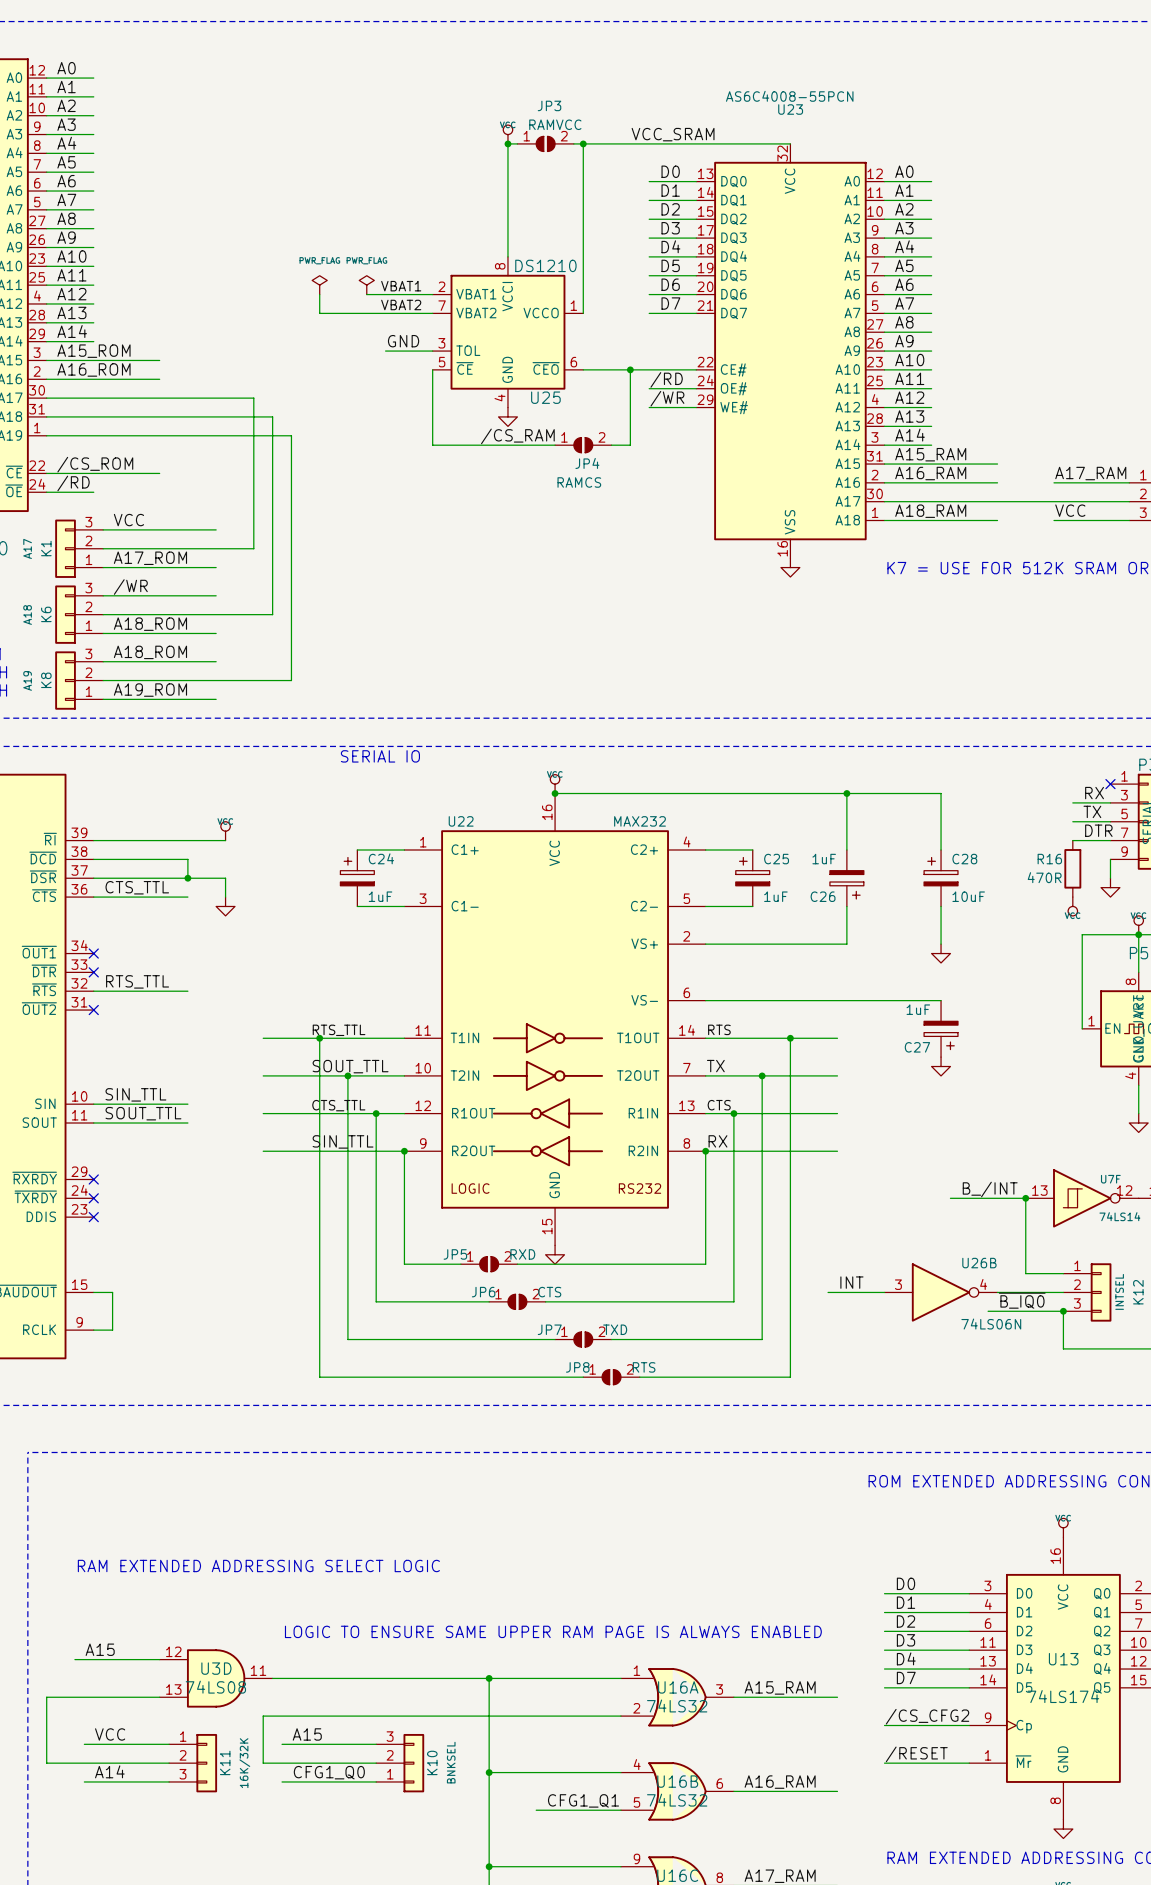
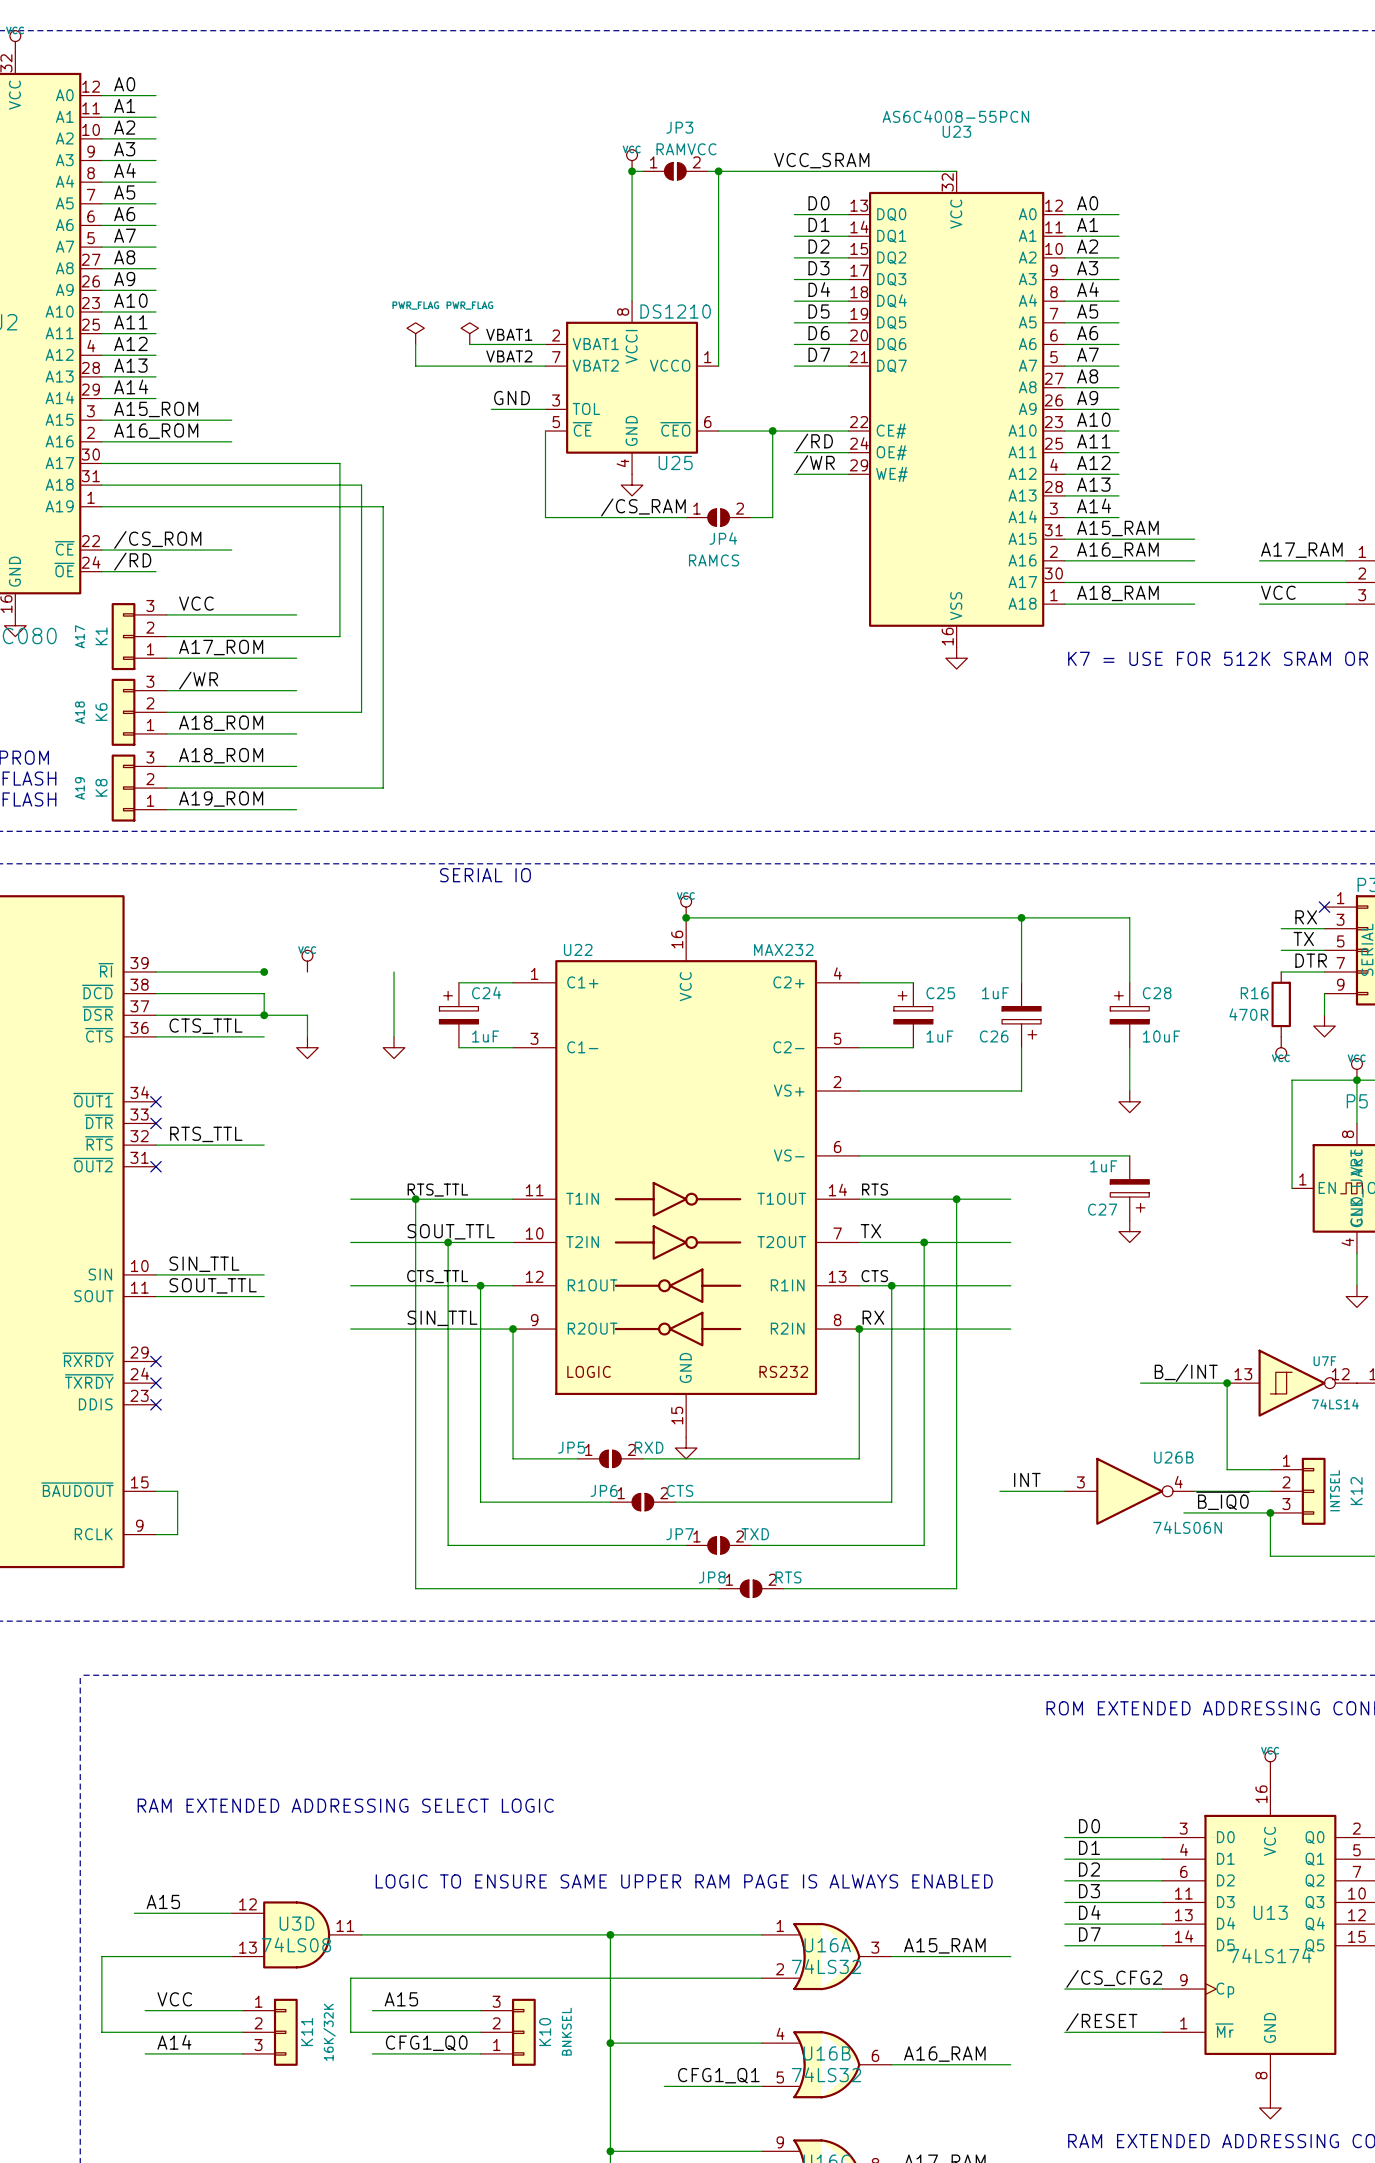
wire: (187, 840) (225, 840) -> none
junction: none -> (264, 971)
wire: none -> (394, 971) (394, 1036)
power symbol: none -> (394, 1047)

